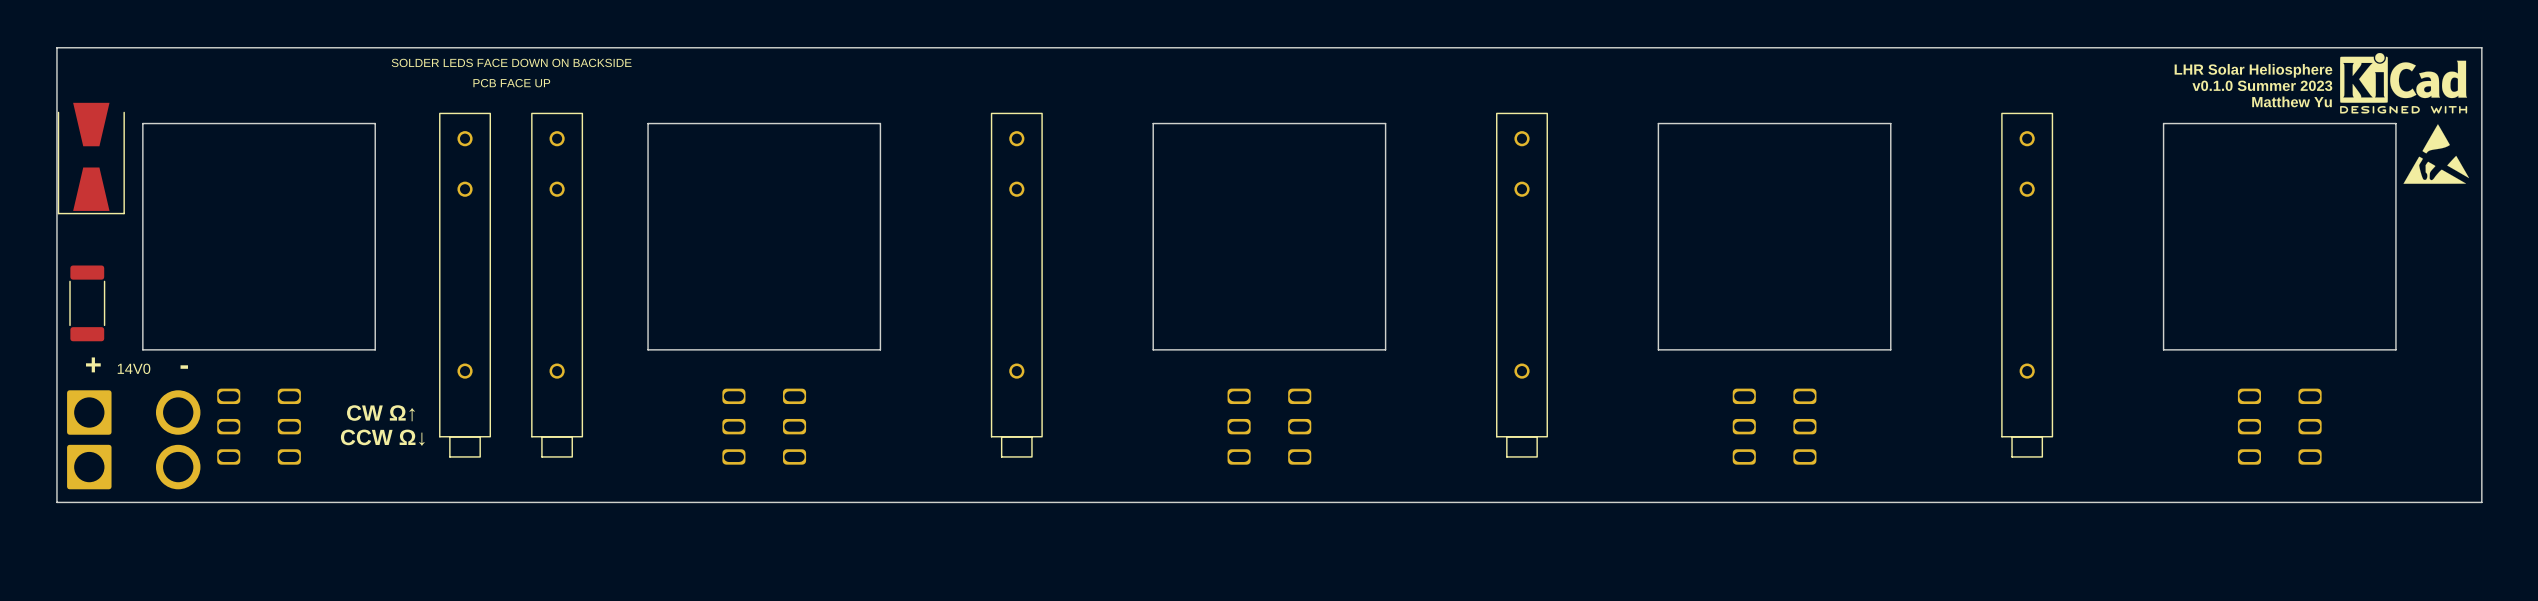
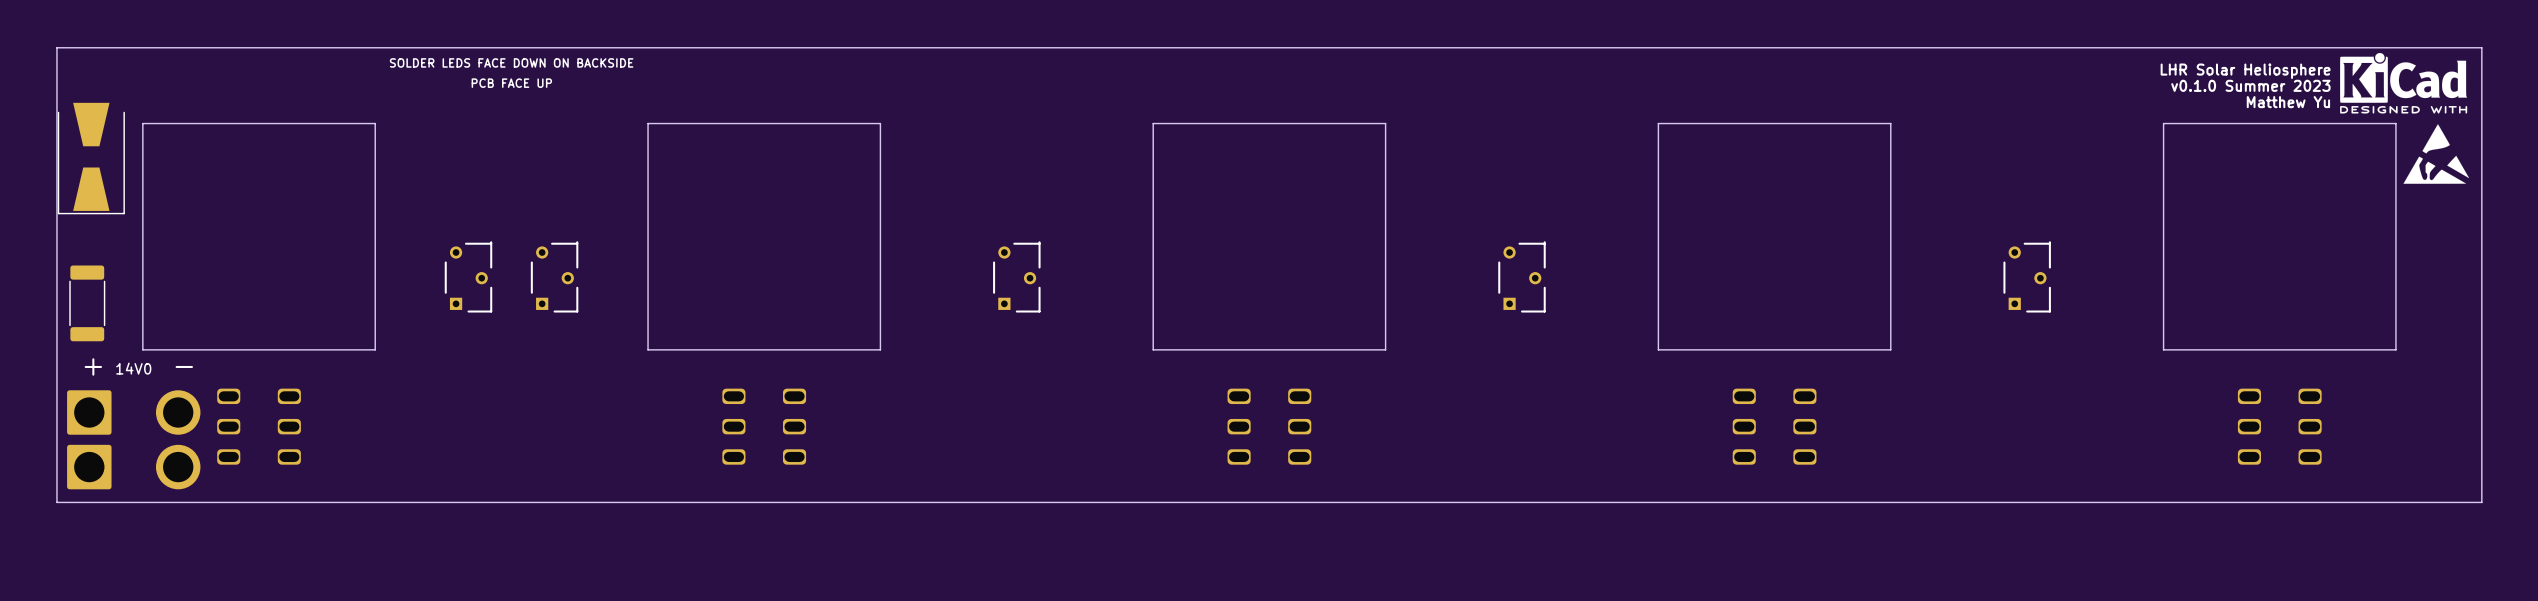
part footprint: [439, 112, 491, 458] -> [444, 241, 493, 313]
part footprint: [531, 112, 583, 458] -> [530, 241, 579, 313]
part footprint: [991, 112, 1043, 458] -> [993, 241, 1041, 313]
part footprint: [1496, 112, 1548, 458] -> [1498, 241, 1546, 313]
part footprint: [2001, 112, 2053, 458] -> [2003, 241, 2051, 313]
text: CW Ω↑ (380, 413) -> none
text: CCW Ω↓ (382, 437) -> none

